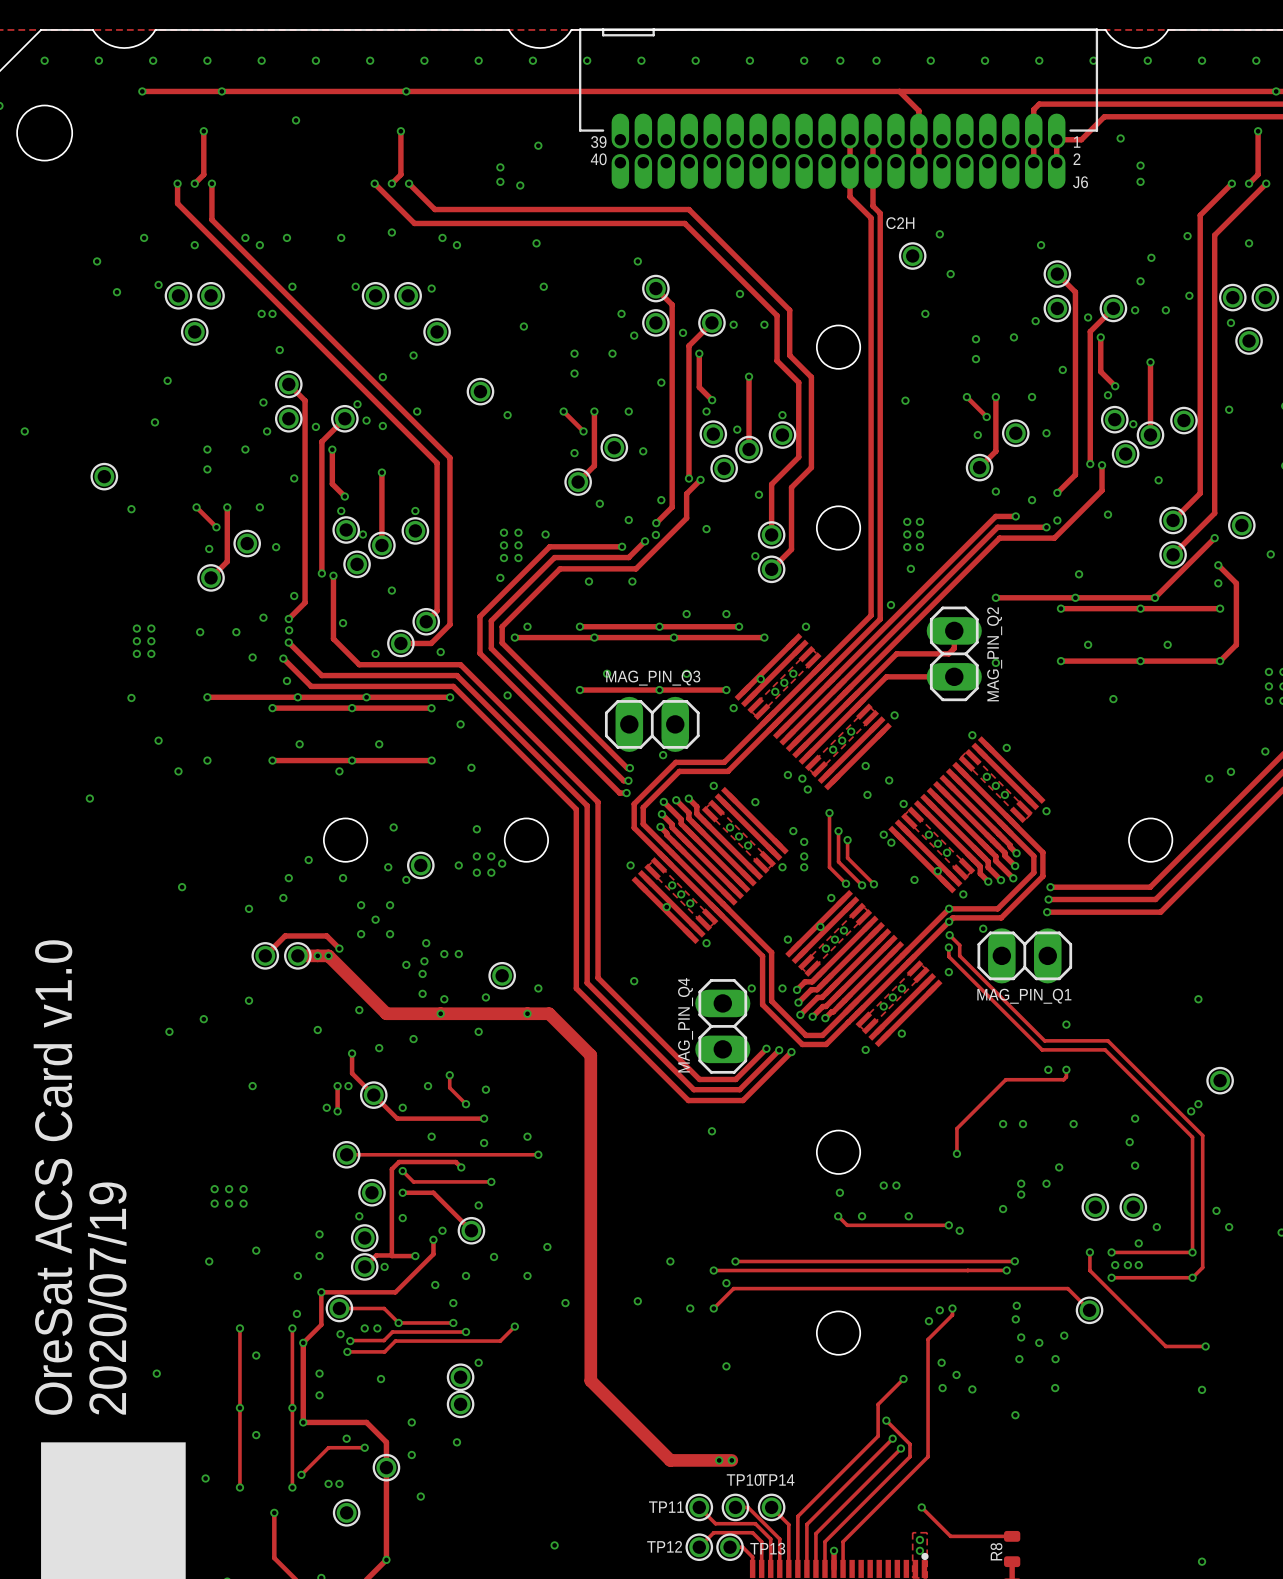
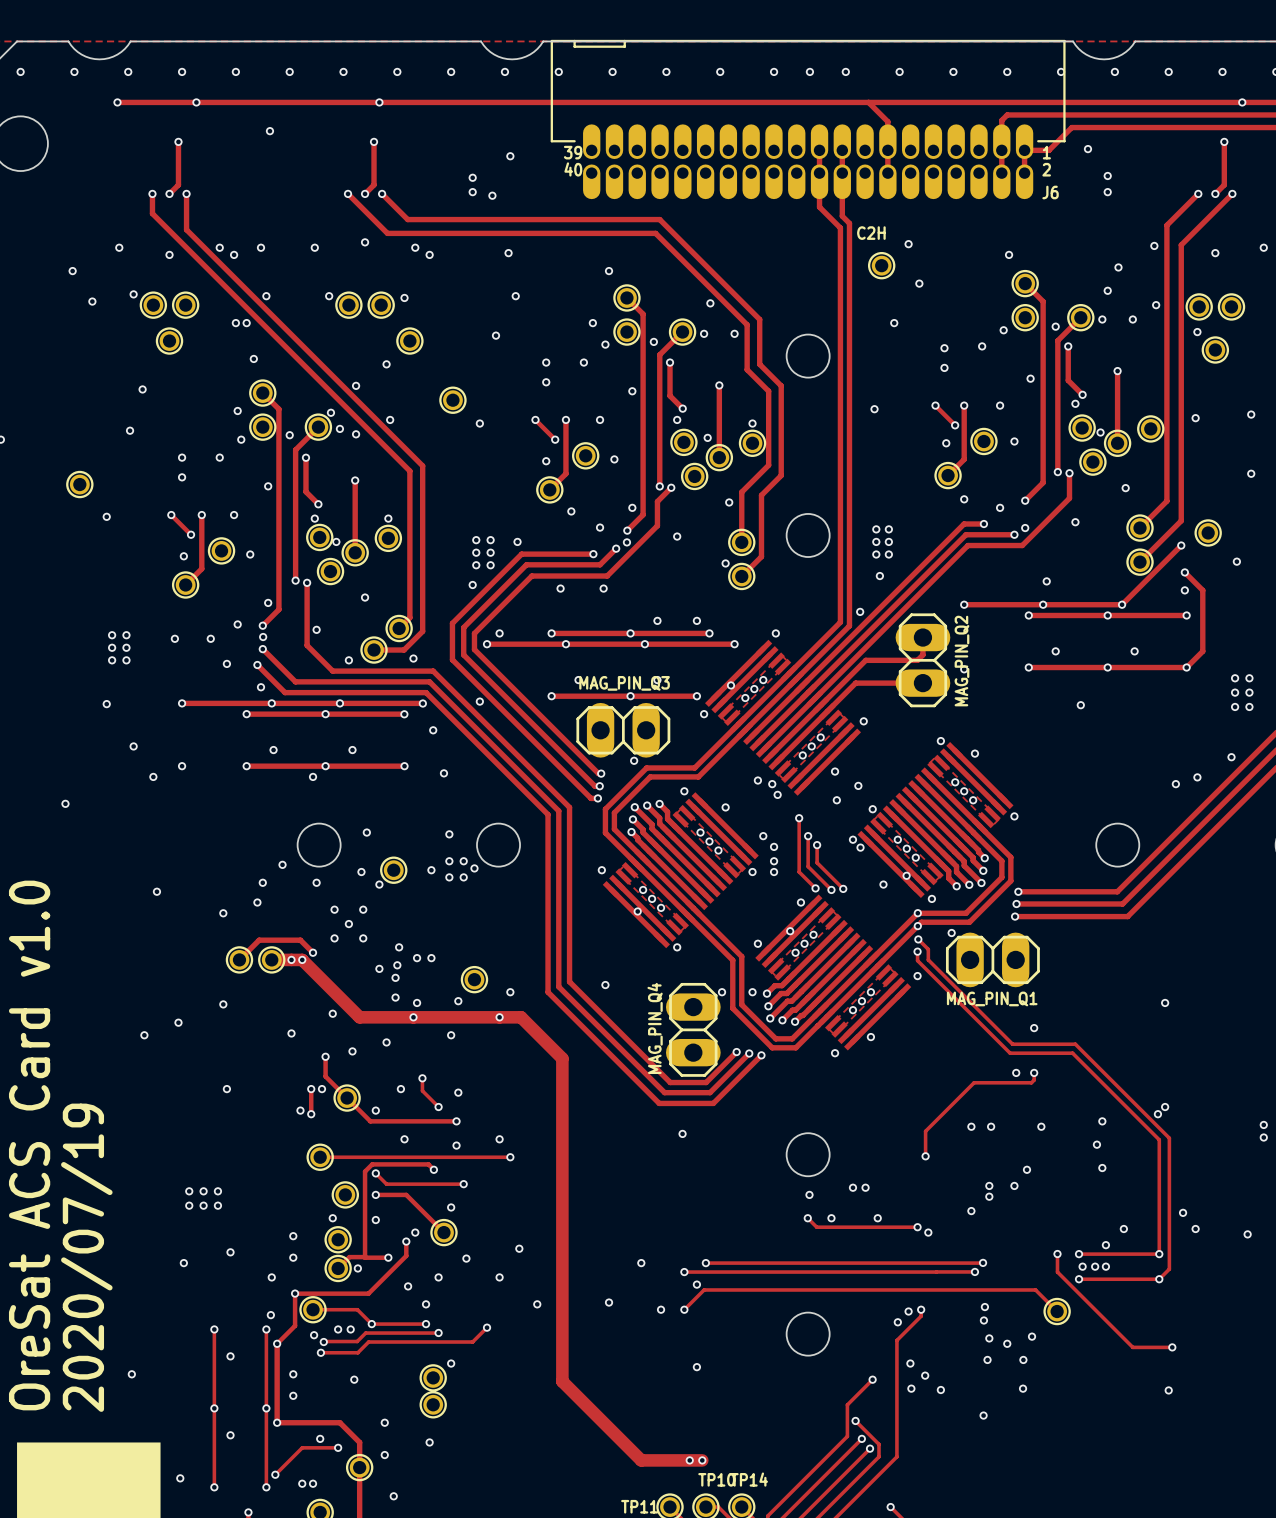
part: (1220, 1080) -> none
part: (1095, 1207) -> none
part: (1133, 1207) -> none

